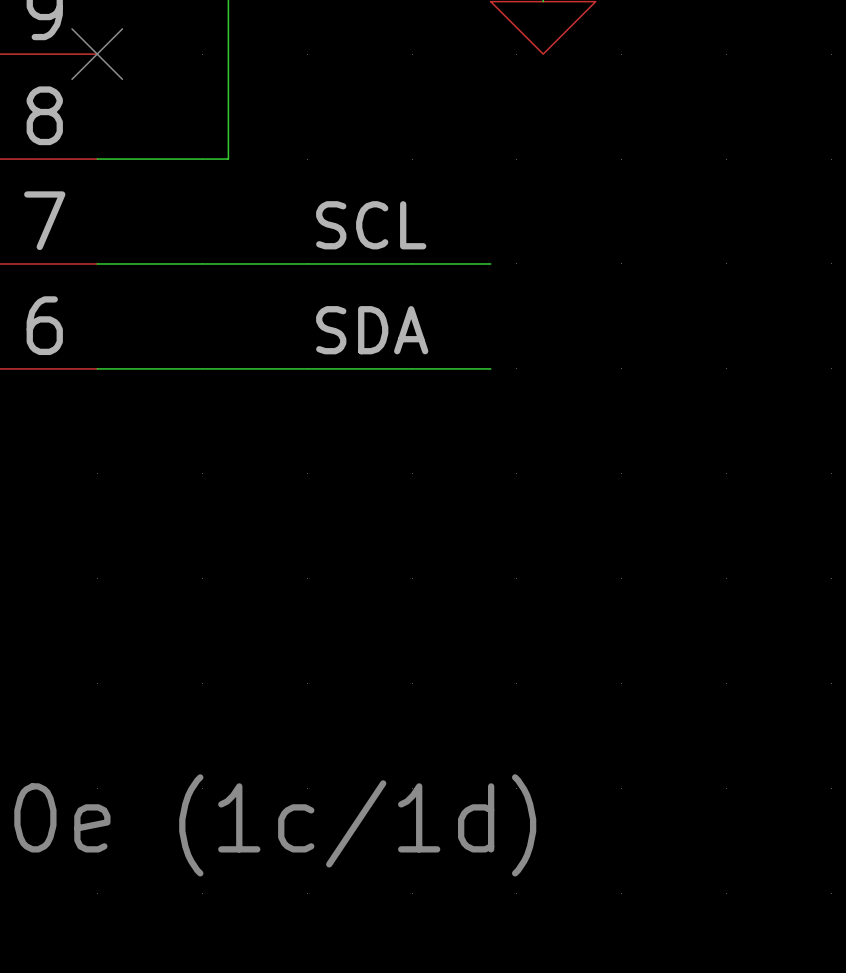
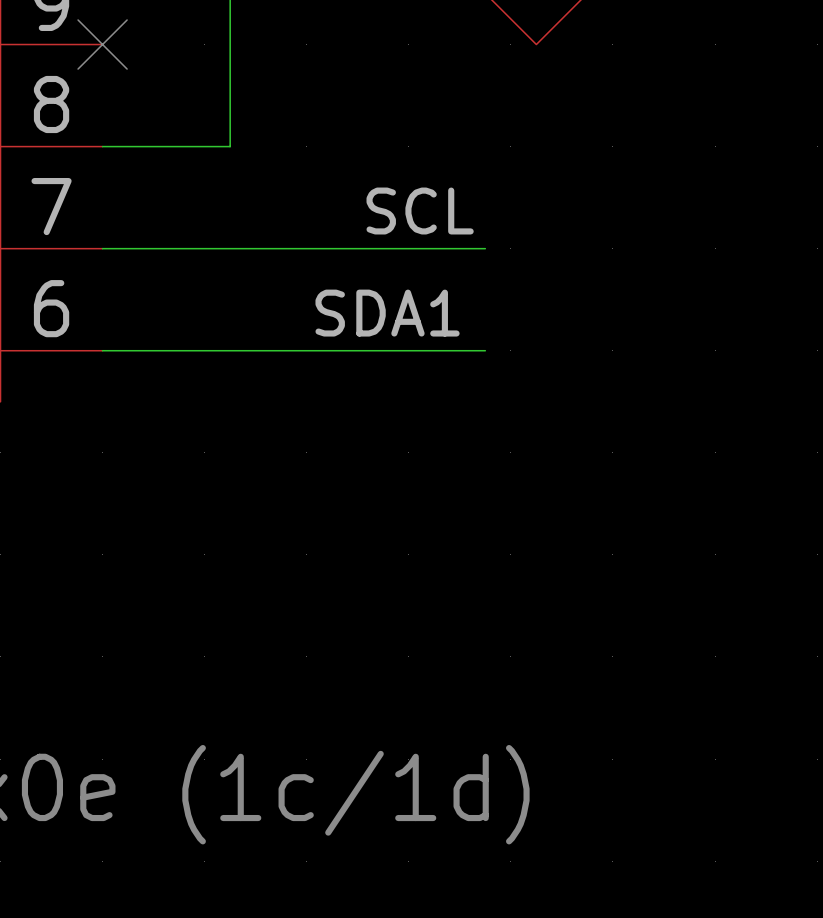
label position: SCL (371, 225) -> SCL (420, 211)
label: SDA (372, 330) -> SDA1 (387, 313)

